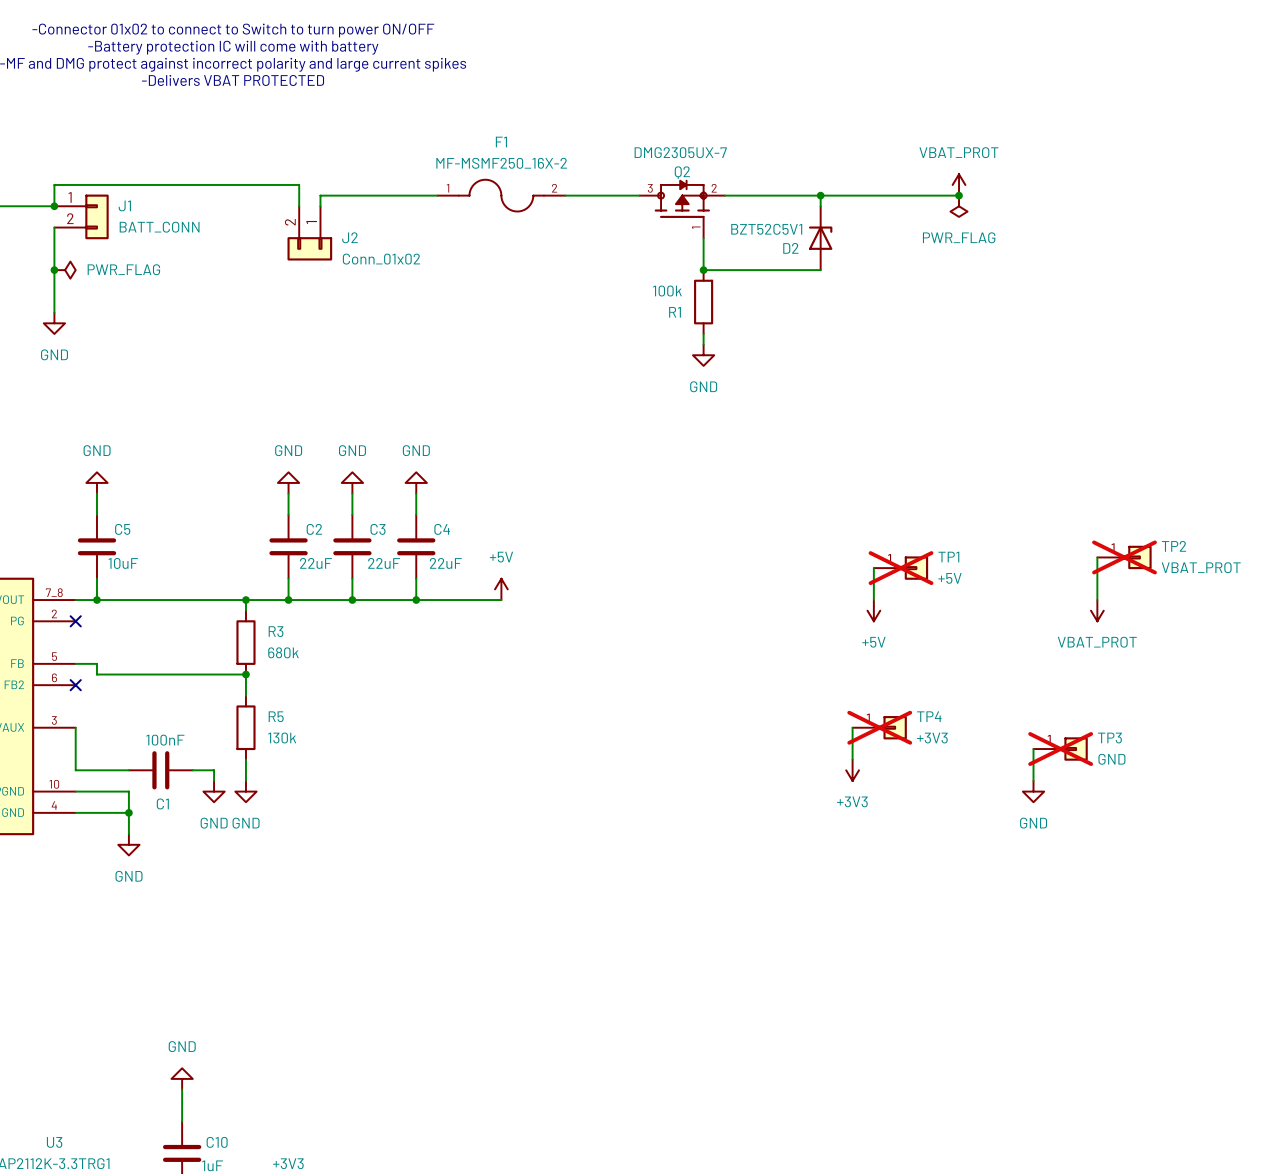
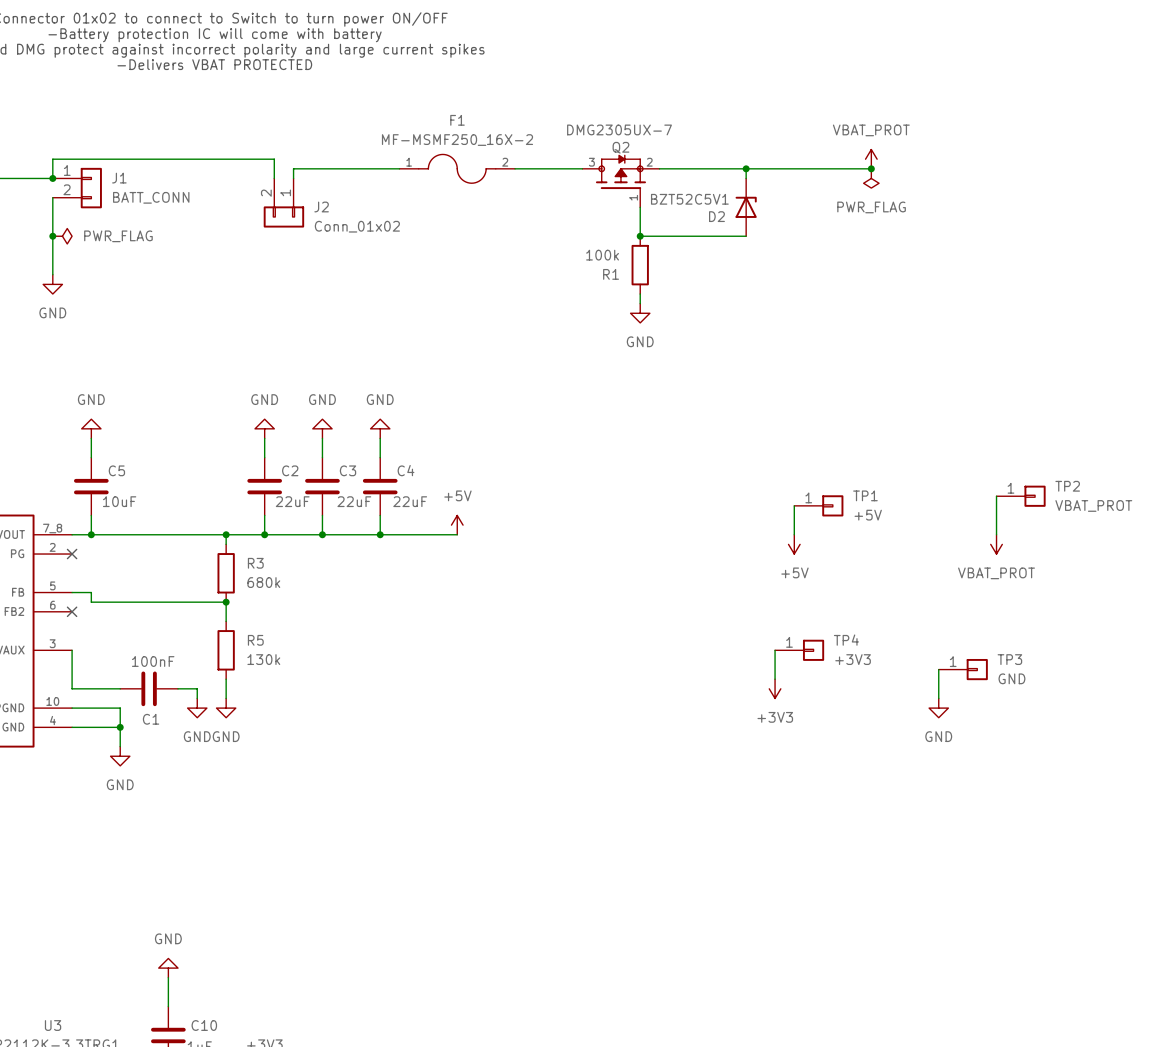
TP2 do-not-place cross: (1124, 557) -> none
TP1 do-not-place cross: (901, 568) -> none
TP4 do-not-place cross: (879, 727) -> none
TP3 do-not-place cross: (1060, 749) -> none

